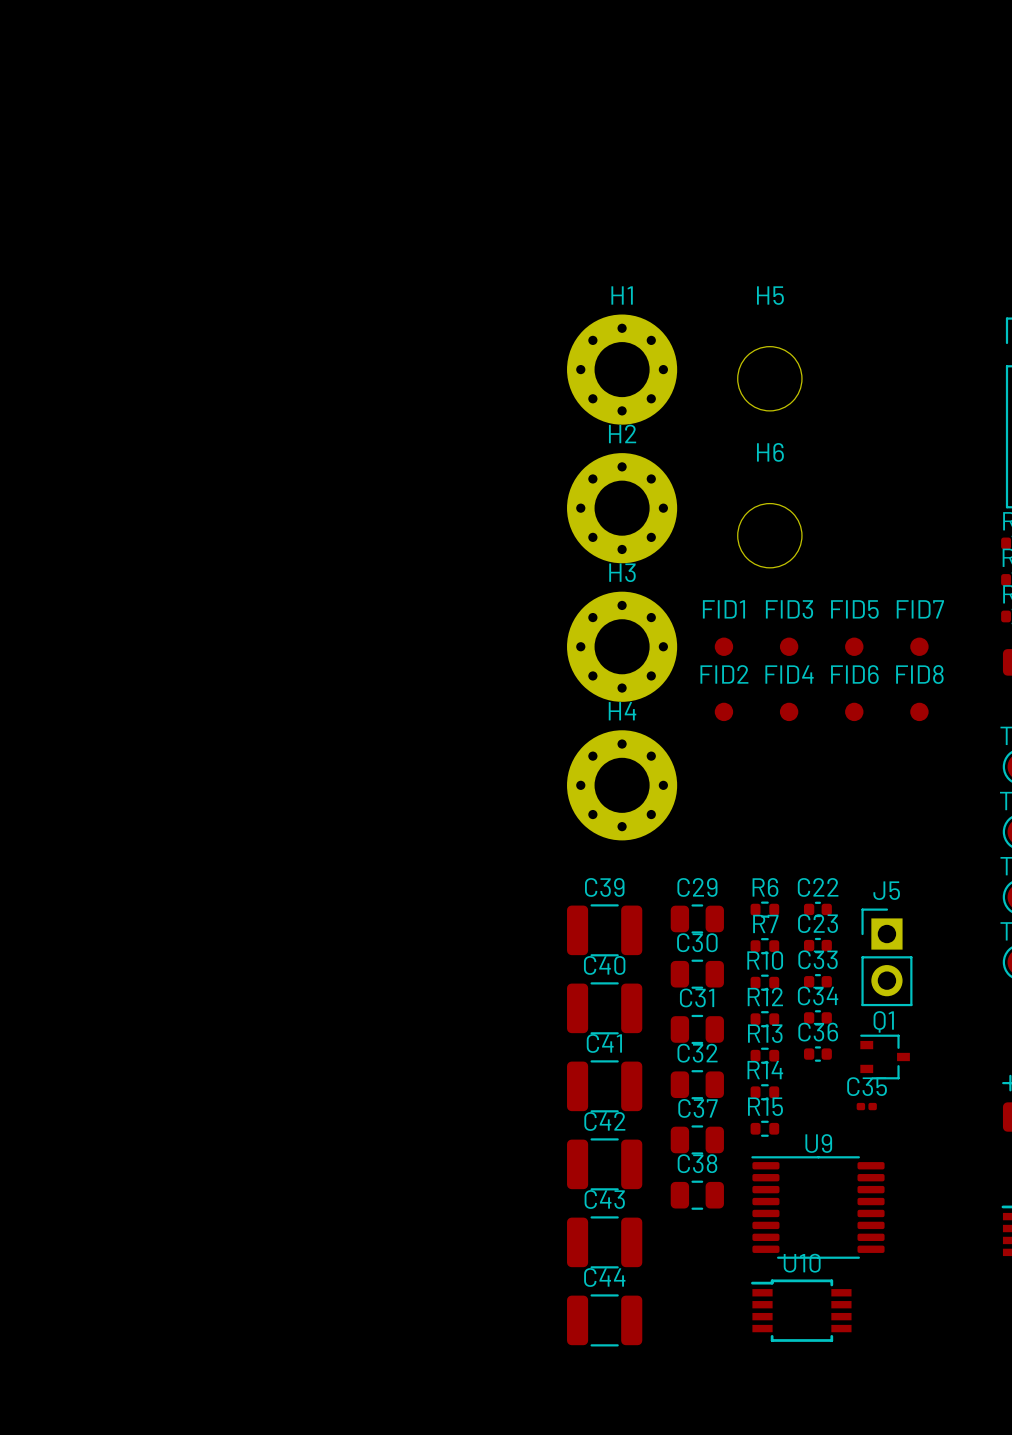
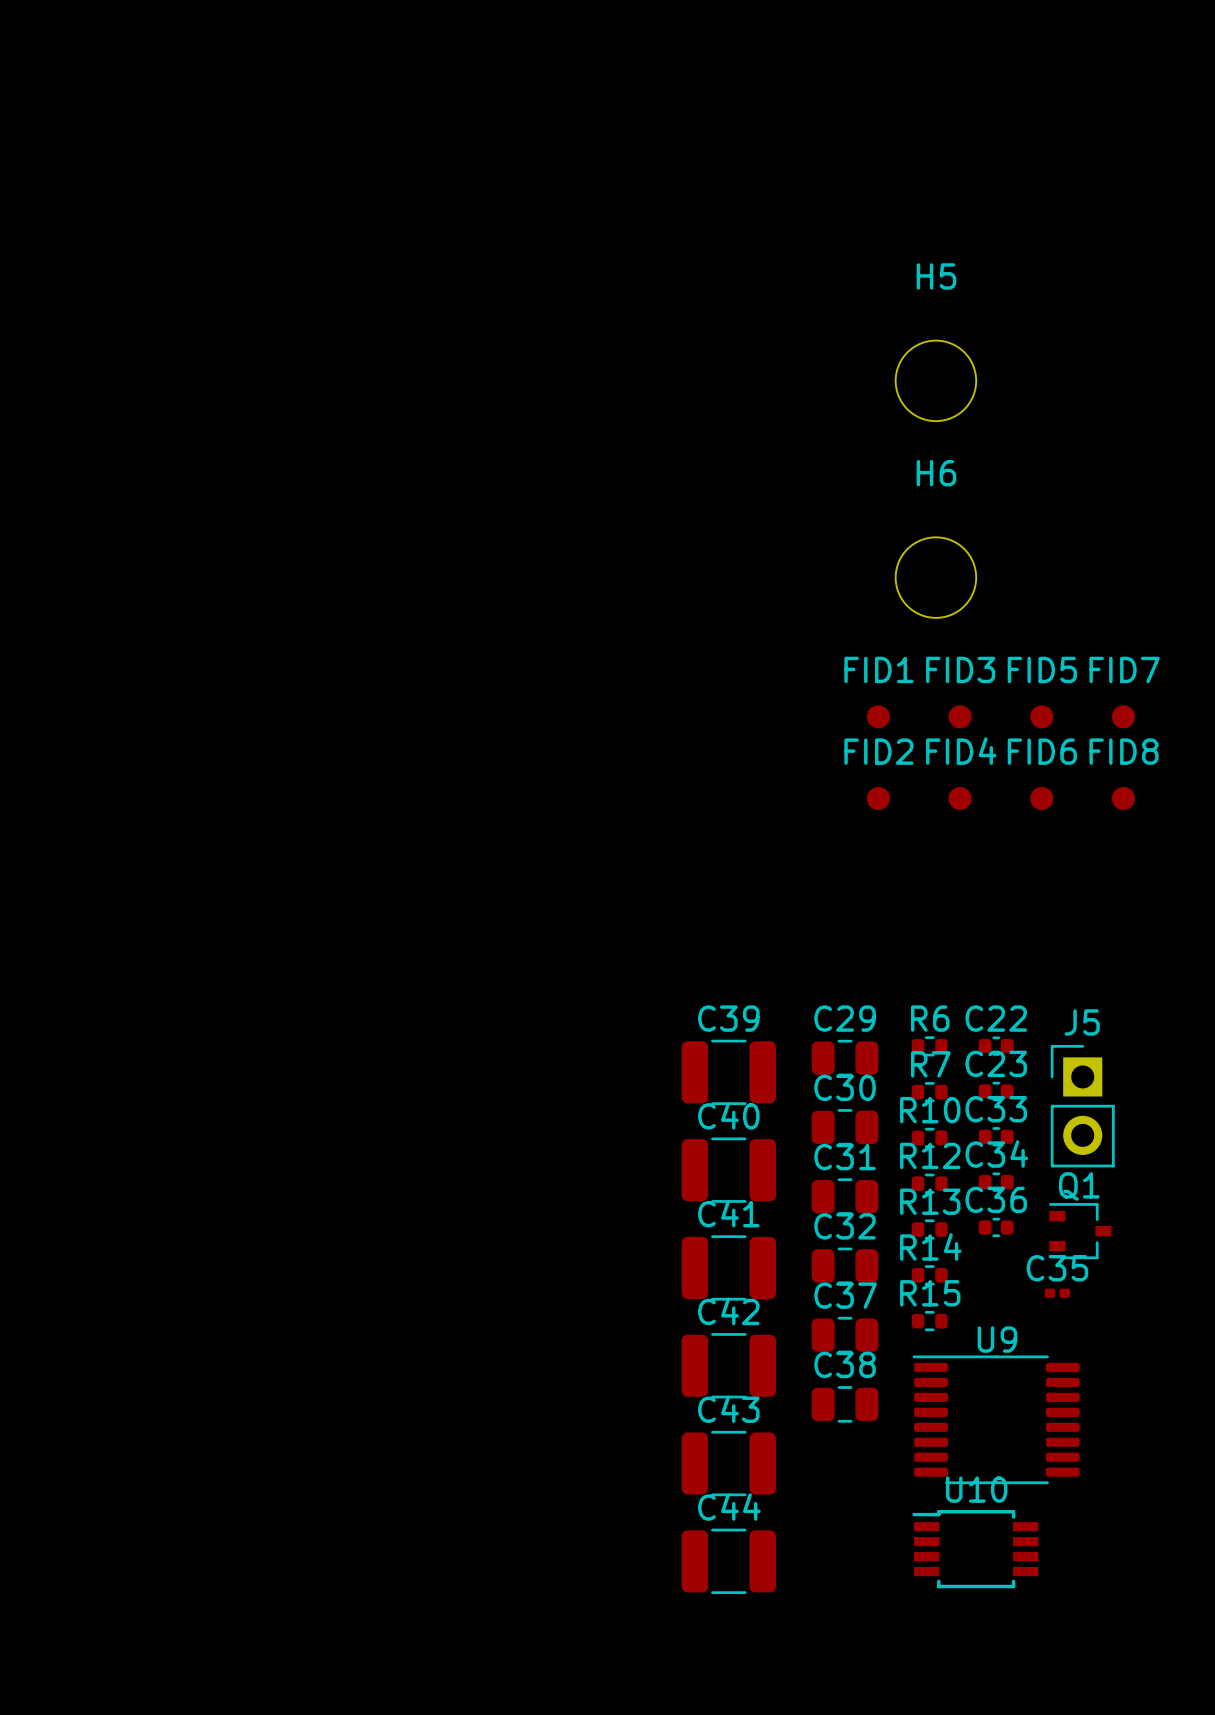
H1: (622, 369) -> none
H2: (622, 508) -> none
H3: (622, 646) -> none
H4: (622, 785) -> none

